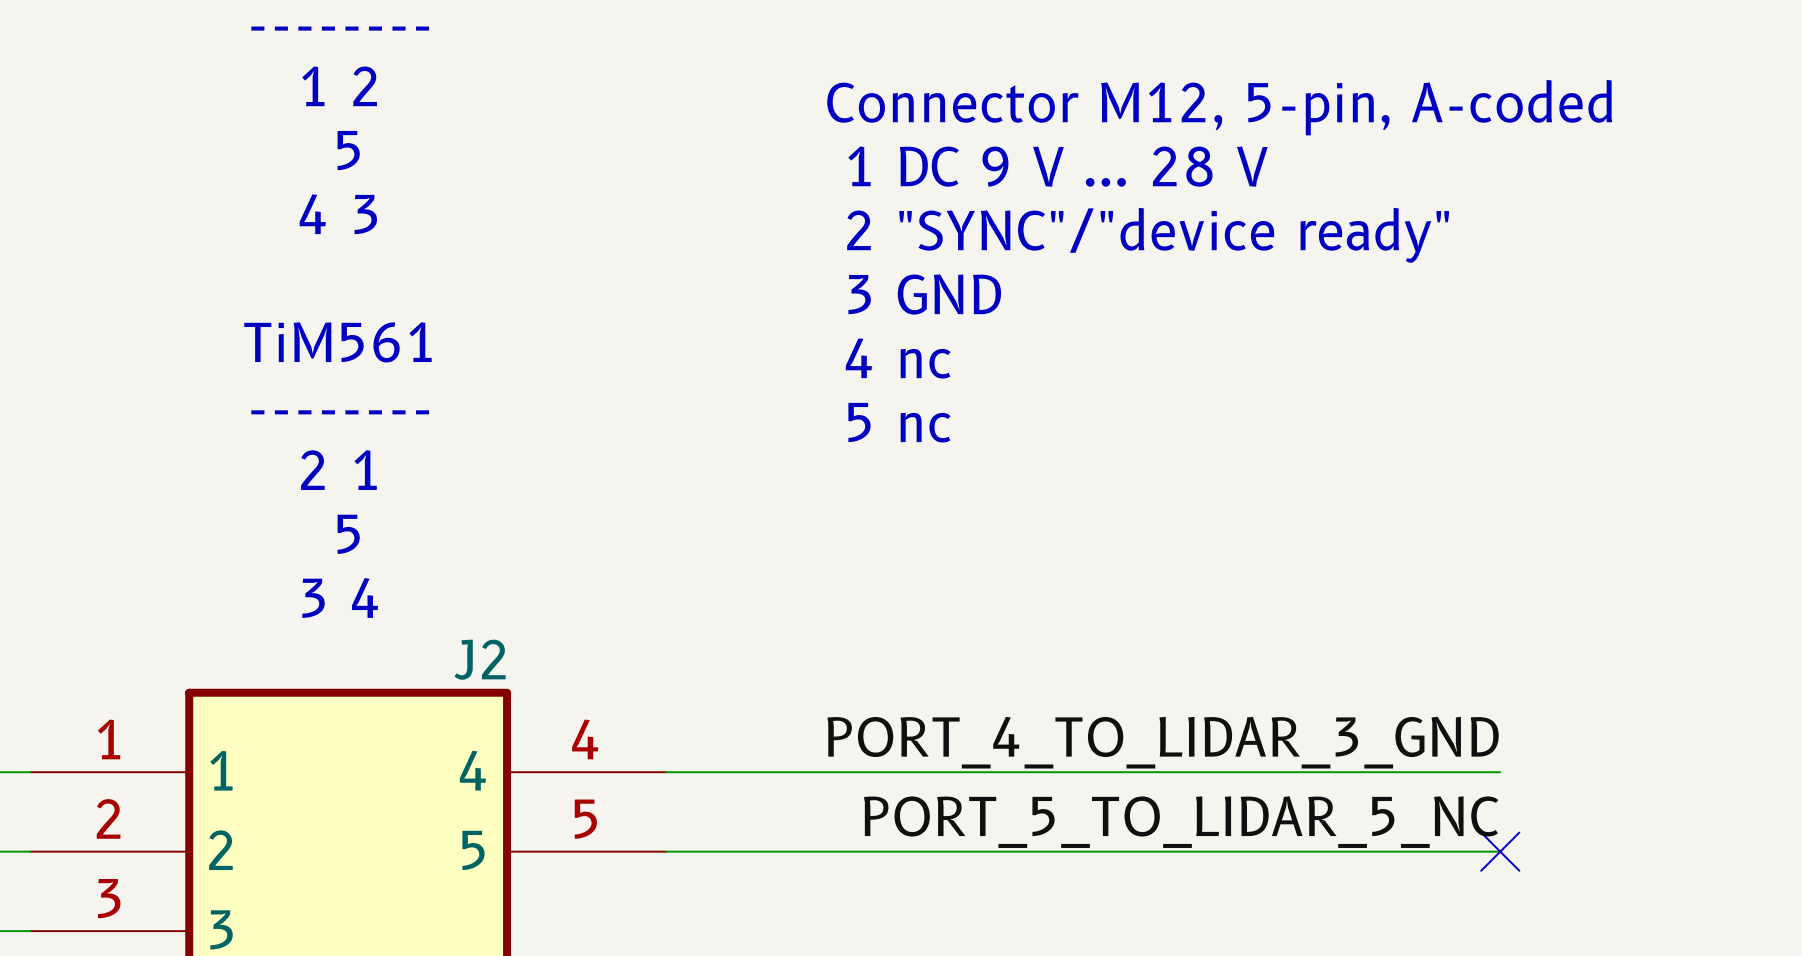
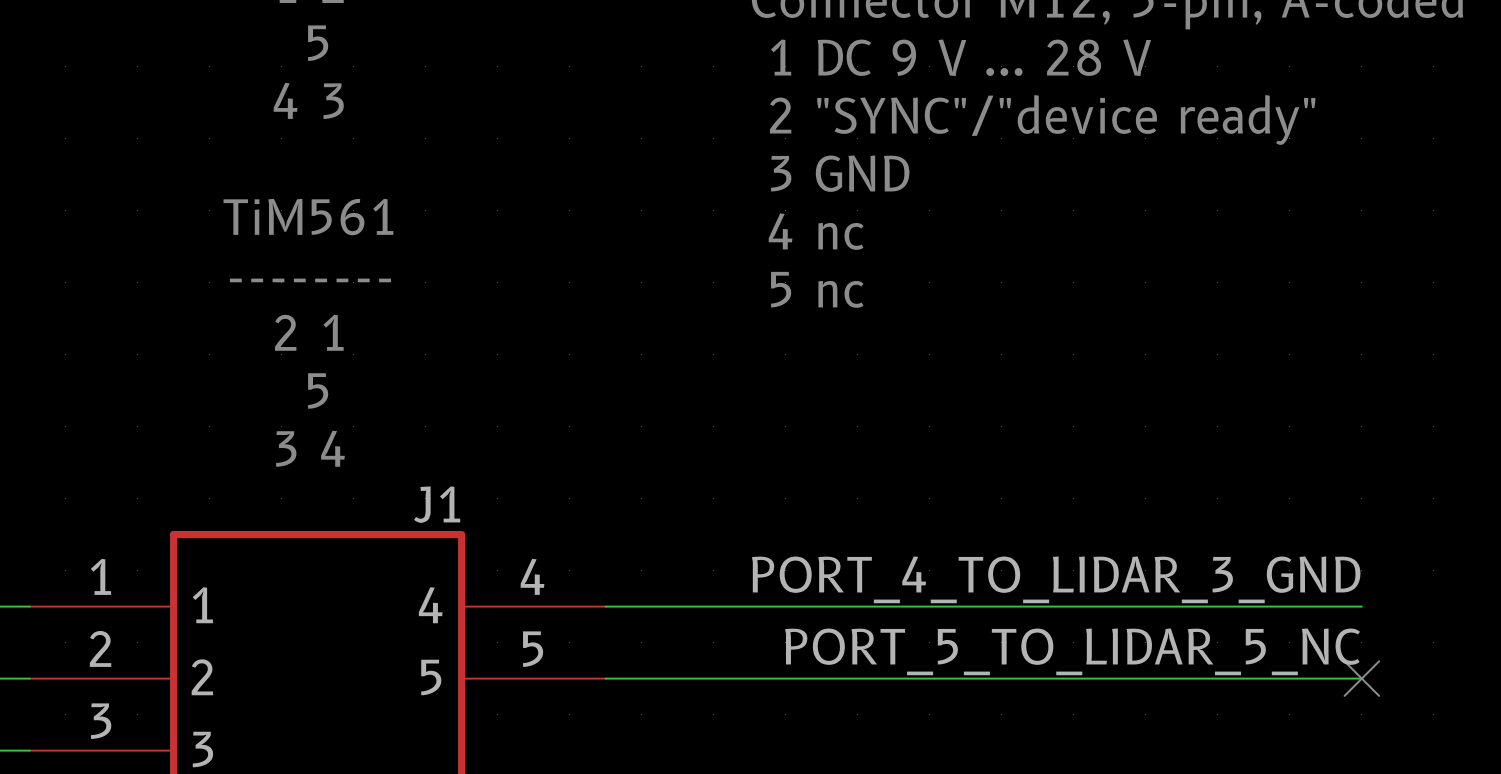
J2 name: J2 (480, 659) -> J1 (437, 504)

